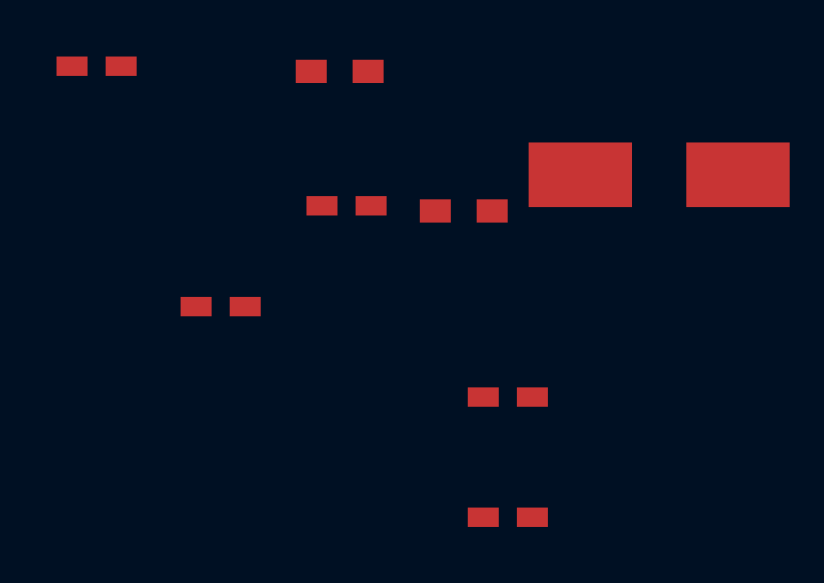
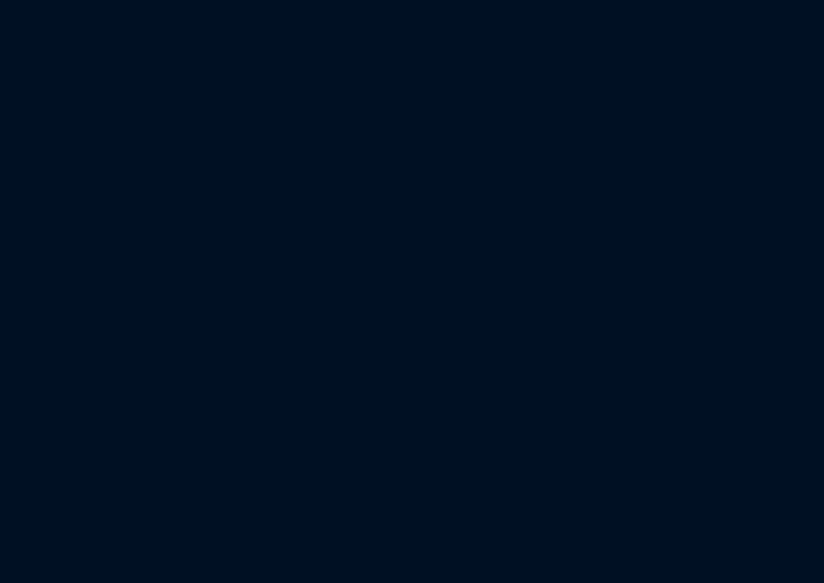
part: (96, 66) -> none
part: (339, 71) -> none
part: (659, 174) -> none
part: (346, 205) -> none
part: (463, 210) -> none
part: (220, 306) -> none
part: (507, 397) -> none
part: (507, 517) -> none

